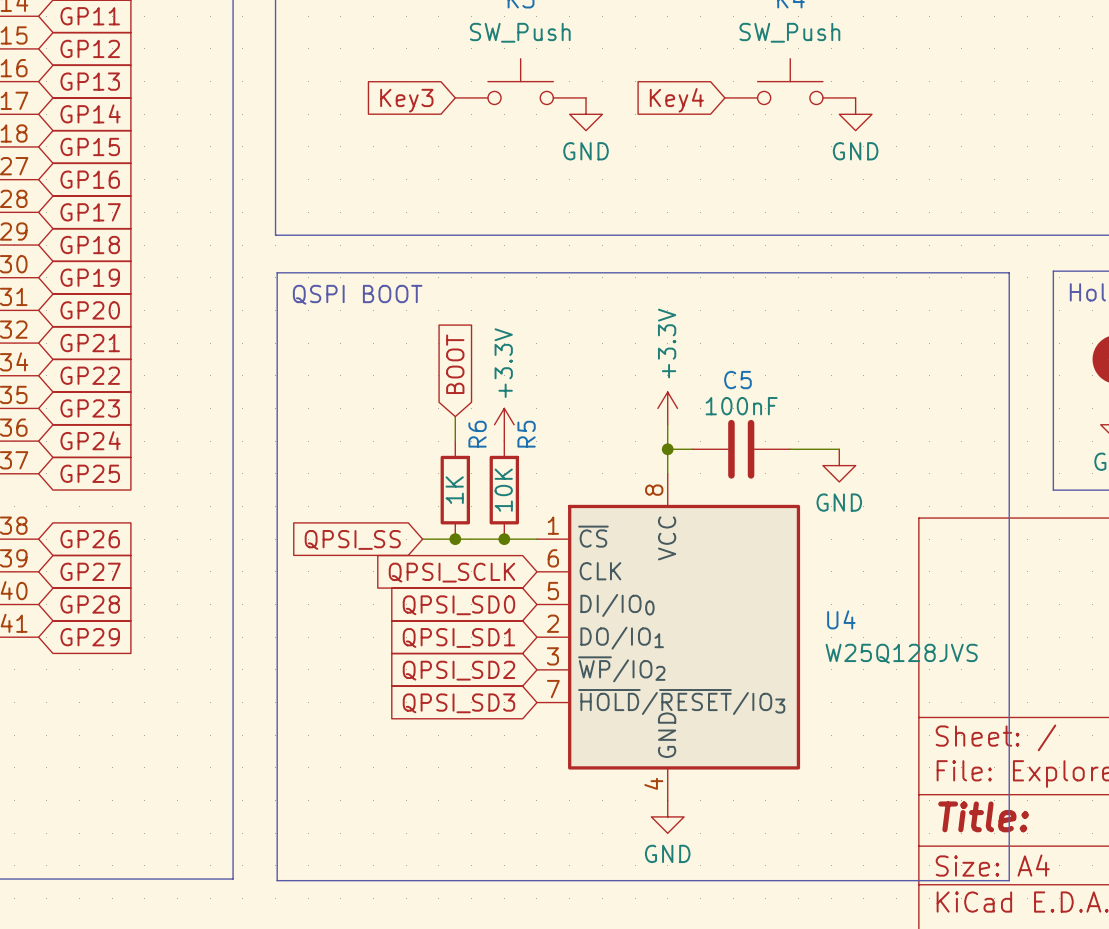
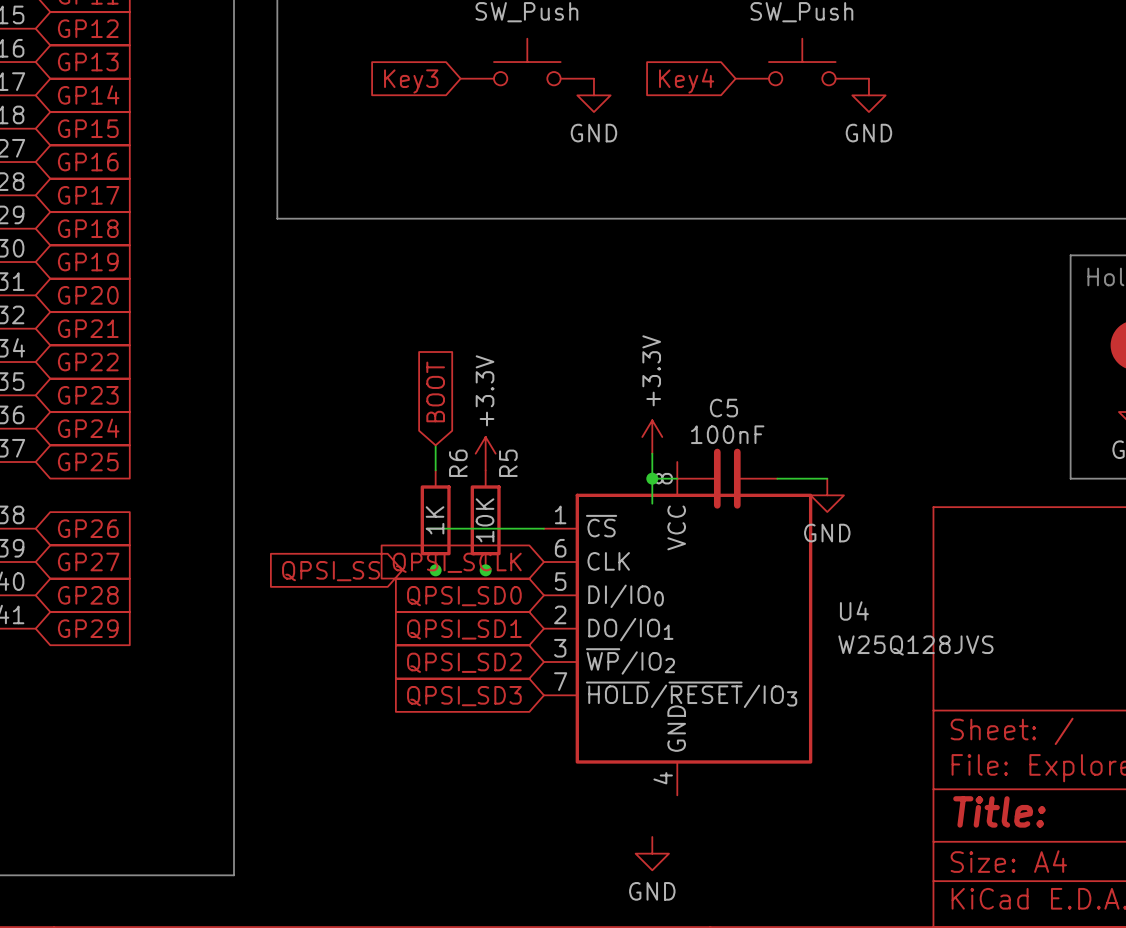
line: (277, 272) (1009, 272) (1009, 880) (277, 880) (277, 272) -> none
text: QSPI BOOT (357, 294) -> none
global label position: BOOT (455, 364) -> BOOT (435, 391)
power symbol position: +3.3V (667, 408) -> +3.3V (652, 437)
wire: (455, 416) (455, 441) -> (435, 445) (435, 470)
power symbol position: +3.3V (504, 424) -> +3.3V (485, 453)
wire: (667, 424) (667, 473) -> (652, 453) (652, 503)
wire: (667, 449) (692, 449) -> (652, 478) (677, 478)
junction position: (667, 449) -> (652, 478)
C5 position: (741, 449) -> (727, 478)
wire: (790, 449) (839, 449) -> (777, 478) (827, 478)
power symbol position: GND (839, 465) -> GND (827, 495)
R6 position: (455, 490) -> (435, 520)
R5 position: (504, 490) -> (485, 520)
global label position: QPSI_SS (352, 539) -> QPSI_SS (331, 571)
junction: (455, 539) -> none
junction: (504, 539) -> none
junction: none -> (435, 570)
junction: none -> (485, 570)
power symbol position: GND (667, 816) -> GND (652, 853)

